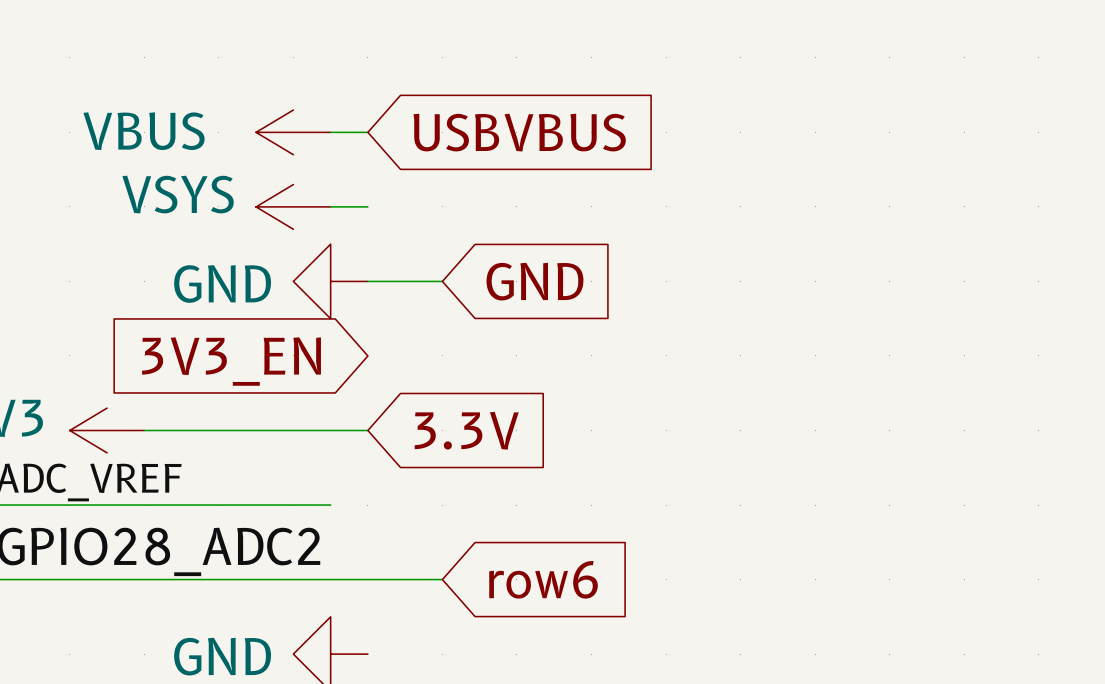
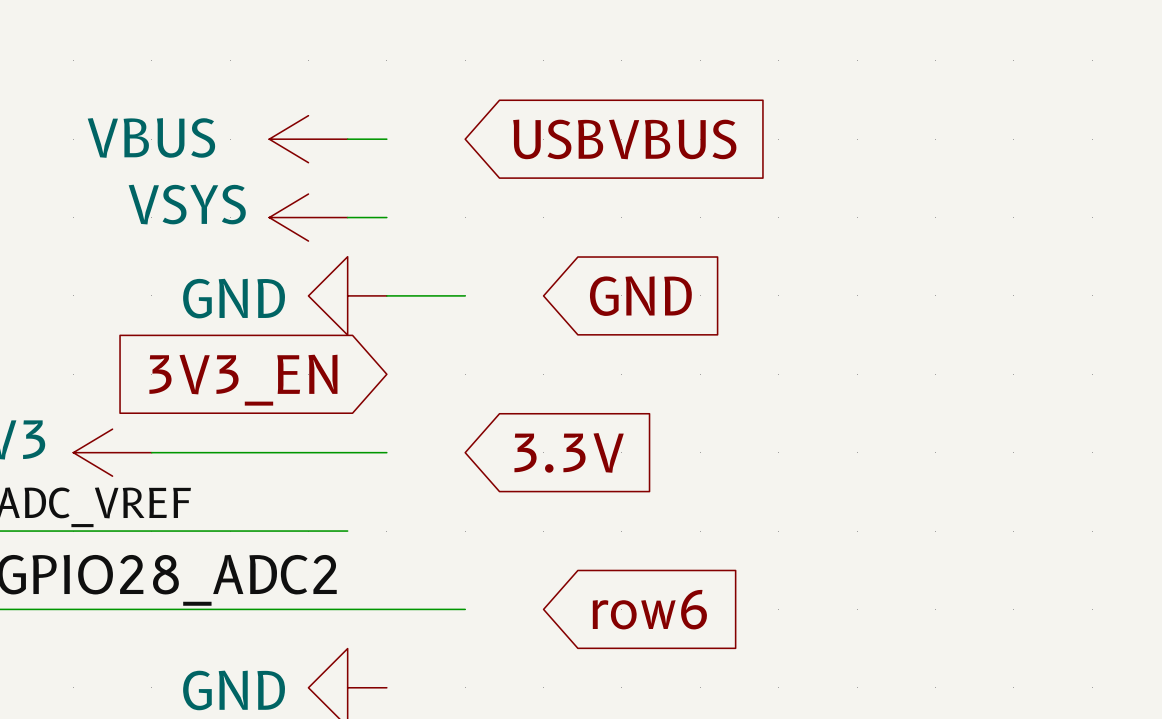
global label position: USBVBUS (519, 132) -> USBVBUS (624, 139)
global label position: GND (534, 281) -> GND (640, 296)
global label position: 3.3V (466, 430) -> 3.3V (569, 452)
global label position: row6 (543, 579) -> row6 (649, 609)

